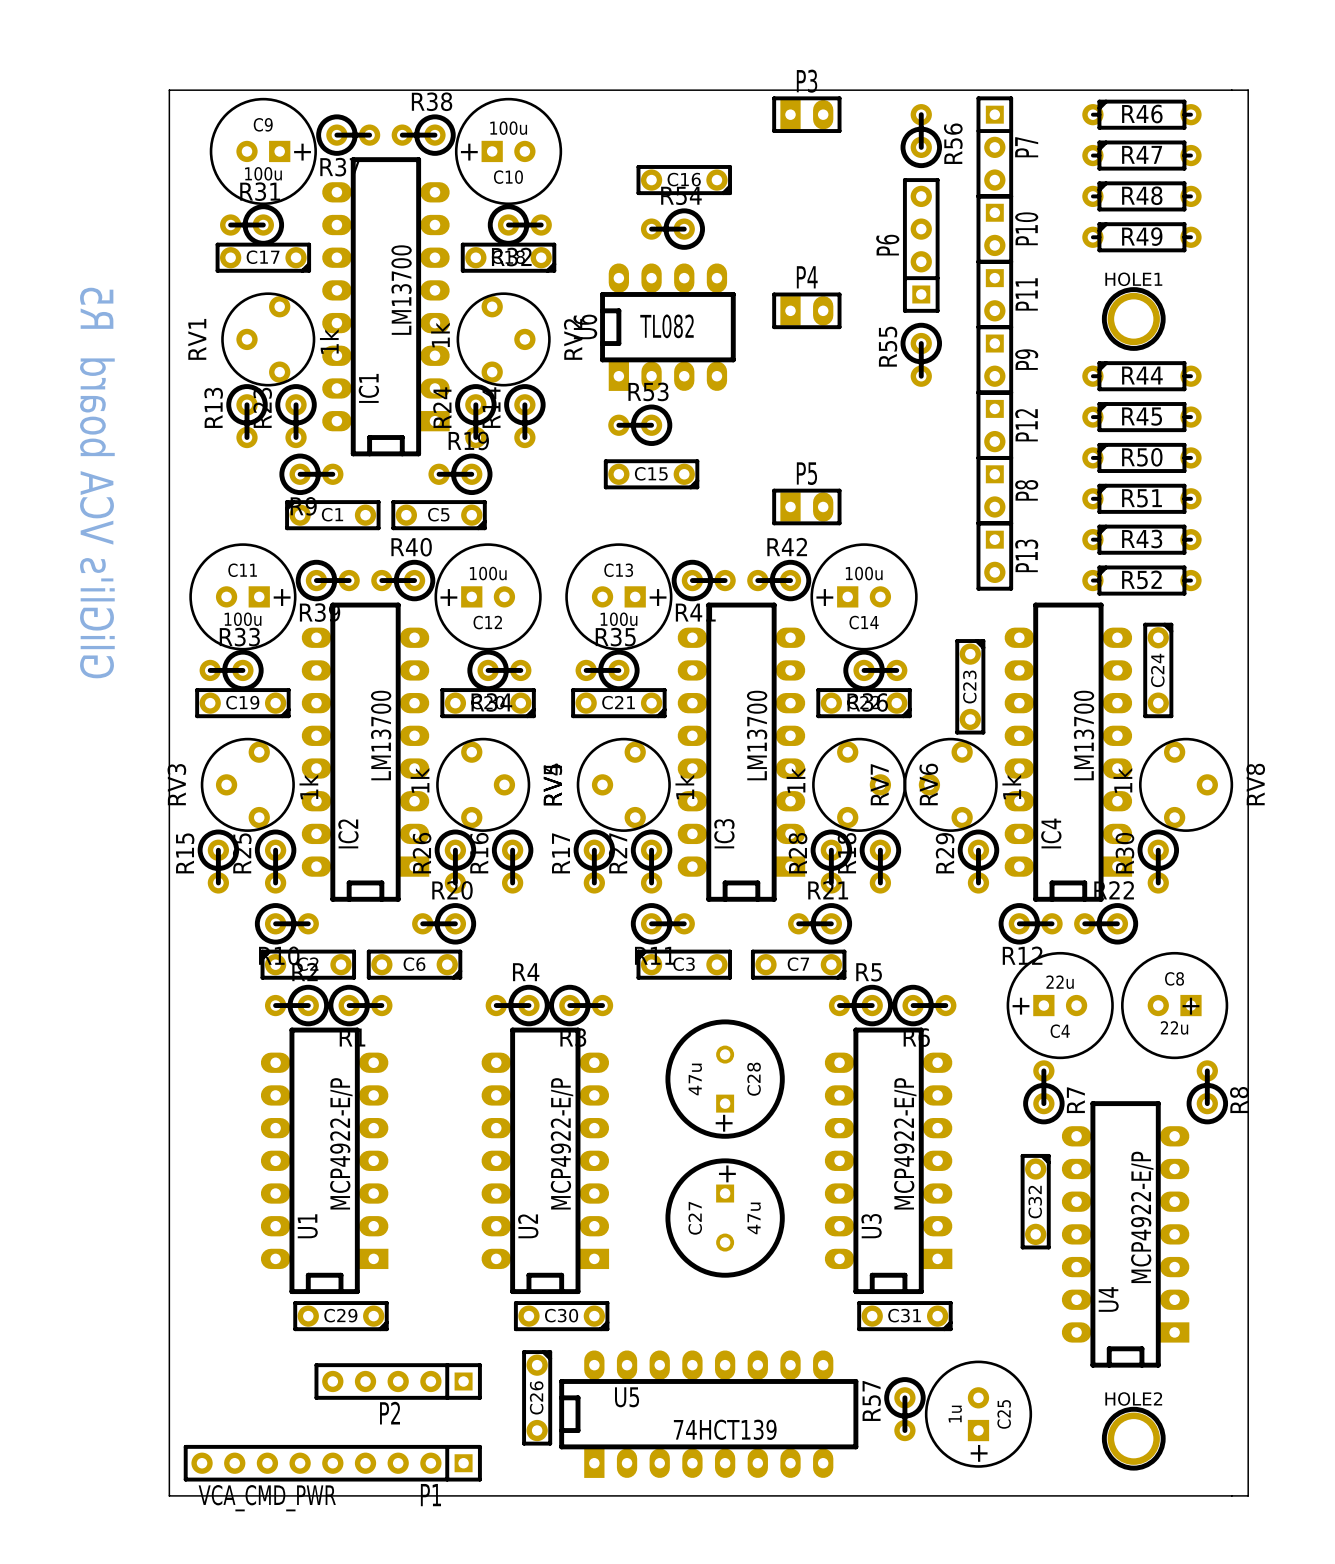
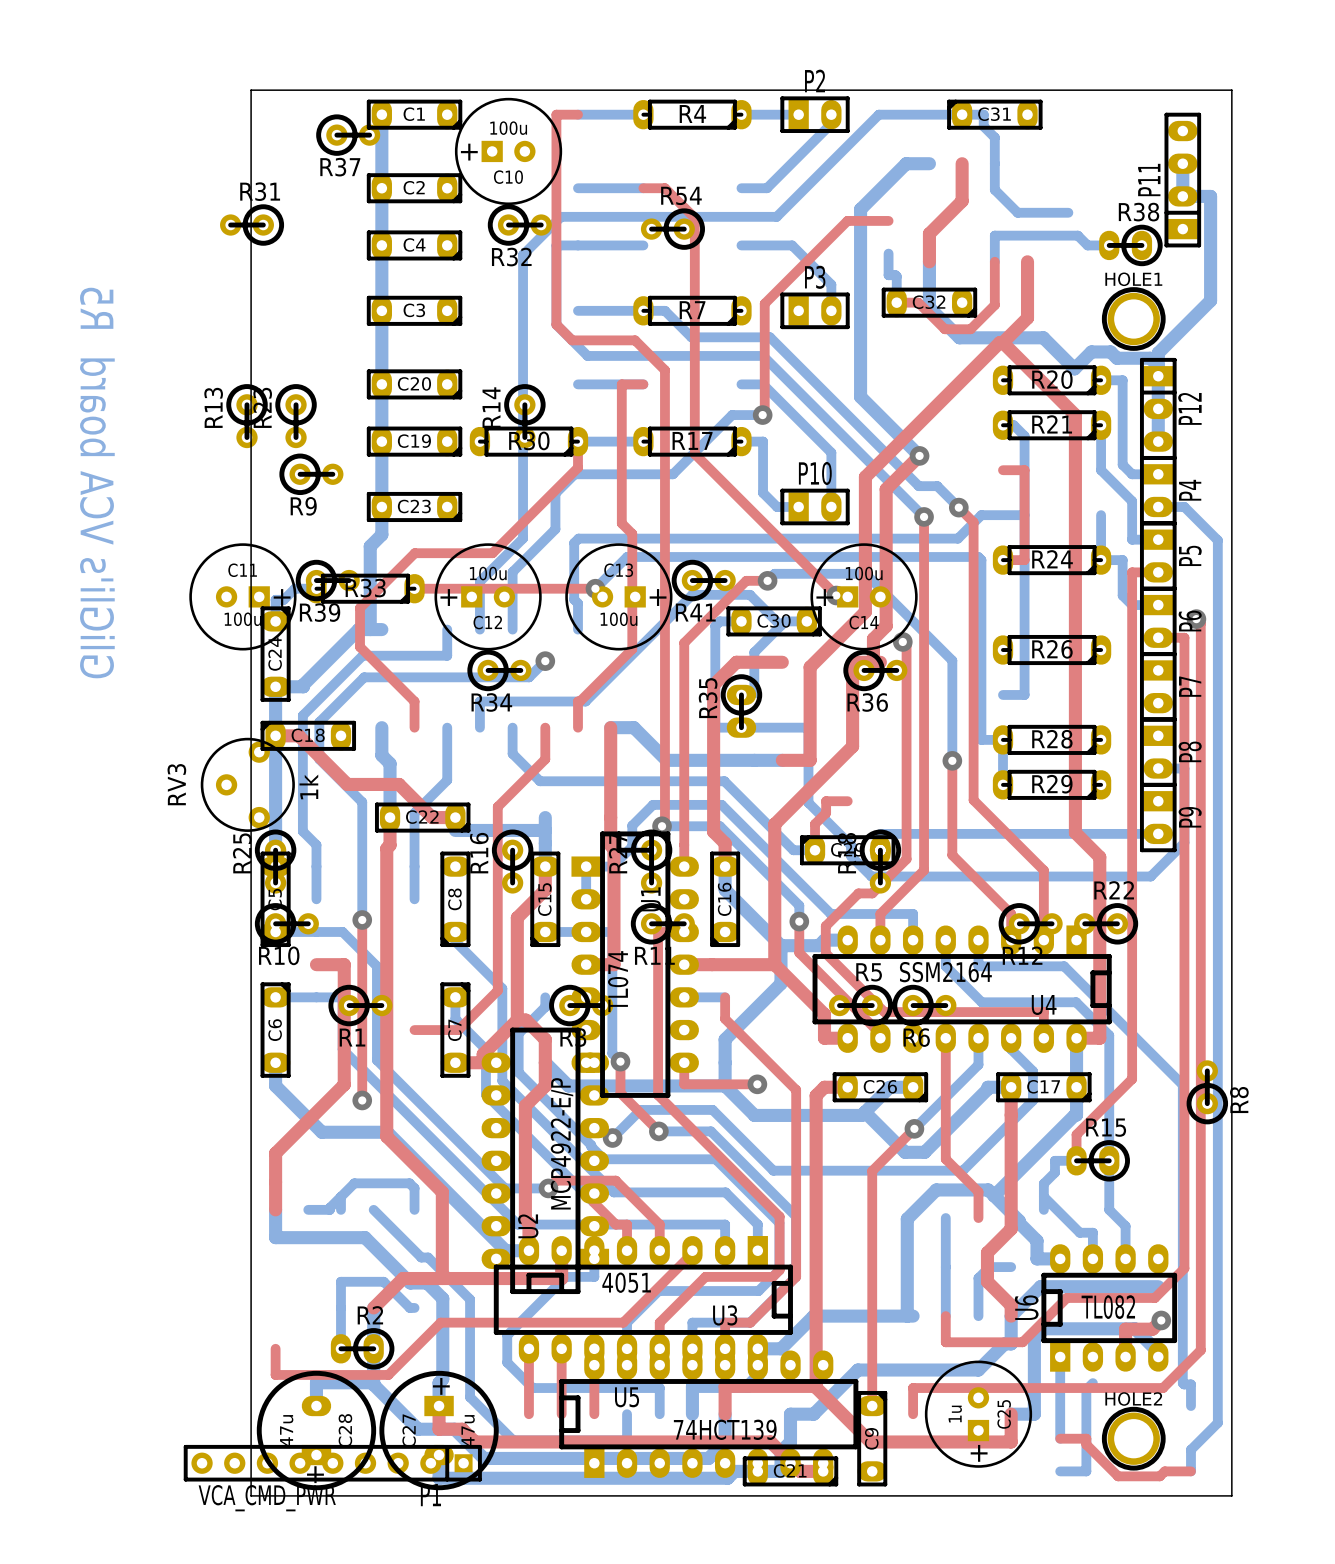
board edge: (251, 90) (169, 90) (169, 1495) (251, 1495) -> (251, 90) (251, 1495)
board edge: (1231, 90) (1248, 90) (1248, 1495) (1231, 1495) -> (1231, 90) (1231, 1495)
P7 footprint: [976, 96, 1014, 199] -> [1139, 652, 1177, 722]
C9 footprint: [209, 97, 317, 206] -> [857, 1390, 888, 1487]
bottom track: none -> (381, 114) (381, 534) (370, 546) (370, 629)
R38 footprint: [391, 114, 456, 156] -> [1099, 224, 1163, 267]
top track: none -> (578, 114) (556, 114) (556, 324) (572, 340) (635, 340) (664, 370) (664, 823) (662, 826)
bottom track: none -> (578, 114) (643, 114)
bottom track: none -> (741, 114) (798, 114)
P3 position: (806, 114) -> (815, 310)
bottom track: none -> (831, 114) (831, 123) (766, 188) (741, 188)
R46: (1141, 114) -> none
C9 name position: C9 (263, 124) -> C9 (871, 1438)
R56: (921, 136) -> none
R47: (1141, 155) -> none
bottom track: none -> (929, 163) (906, 163) (860, 209) (860, 396) (919, 455)
top track: none -> (962, 163) (962, 201) (929, 233) (929, 261)
bottom track: none -> (1182, 163) (1182, 196) (1210, 196) (1210, 300) (1158, 353) (1158, 441)
C16 footprint: [636, 165, 732, 196] -> [710, 851, 741, 948]
C9 value: 100u (263, 173) -> none
P6 footprint: [902, 178, 940, 313] -> [1139, 586, 1177, 657]
bottom track: none -> (578, 188) (643, 188)
top track: none -> (643, 188) (664, 188) (694, 218) (694, 454) (836, 595)
P10 footprint: [976, 194, 1014, 264] -> [780, 488, 850, 526]
R48: (1141, 196) -> none
bottom track: none -> (1068, 212) (1017, 212) (994, 189) (994, 137) (983, 126) (983, 114) (878, 114) (776, 216) (561, 216) (523, 254) (523, 538) (479, 581) (479, 629)
top track: none -> (888, 220) (847, 220) (764, 303) (764, 412) (762, 415)
P10 name position: P10 (1026, 228) -> P10 (815, 473)
R49: (1141, 237) -> none
C17 footprint: [215, 242, 312, 273] -> [996, 1072, 1092, 1103]
C18 footprint: [460, 242, 557, 273] -> [260, 720, 357, 751]
bottom track: none -> (643, 245) (556, 245) (556, 324) (587, 355) (763, 355) (924, 516)
bottom track: none -> (741, 245) (792, 245) (831, 284) (831, 310)
P6 name position: P6 (887, 245) -> P6 (1190, 621)
bottom track: none -> (1109, 245) (1087, 245) (1077, 235) (994, 235) (994, 261)
bottom track: none -> (888, 253) (888, 275) (896, 276) (896, 302)
P11 footprint: [976, 259, 1014, 330] -> [1164, 112, 1202, 248]
bottom track: none -> (929, 261) (929, 307) (959, 337) (1043, 337) (1074, 368) (1091, 351) (1110, 351) (1116, 358) (1150, 358) (1158, 366)
top track: none -> (994, 261) (994, 305) (970, 329) (944, 329) (918, 302) (896, 302)
top track: none -> (1027, 261) (1027, 318) (1002, 342)
P11 name position: P11 (1026, 294) -> P11 (1149, 180)
IC1: LM13700 (385, 306) -> none
bottom track: none -> (578, 310) (664, 310) (691, 337) (770, 337) (918, 486) (937, 486) (958, 507)
P4 rotation: 0° (806, 310) -> 90° clockwise (1158, 490)
P4 position: (806, 310) -> (1158, 490)
P9 footprint: [976, 325, 1014, 395] -> [1139, 782, 1177, 853]
U6 position: (667, 327) -> (1109, 1307)
RV1: 1k (268, 339) -> none
RV2: 1k (503, 339) -> none
top track: none -> (1002, 342) (1075, 415) (1075, 832) (1099, 857) (1099, 1038) (1076, 1038)
top track: none -> (1002, 342) (999, 342) (865, 477) (865, 611) (810, 667) (810, 760) (782, 760)
R55: (921, 354) -> none
R44: (1141, 376) -> none
bottom track: none -> (1101, 380) (1122, 380) (1122, 464) (1132, 474) (1158, 474)
R24 footprint: [455, 384, 497, 449] -> [992, 545, 1112, 576]
bottom track: none -> (578, 384) (643, 384)
top track: none -> (643, 384) (621, 384) (621, 523) (632, 533) (632, 649) (578, 701) (578, 727)
bottom track: none -> (741, 384) (763, 384) (831, 452) (831, 506)
P12 footprint: [976, 390, 1014, 460] -> [1139, 357, 1177, 460]
R24 name position: R24 (442, 407) -> R24 (1052, 559)
bottom track: none -> (762, 415) (732, 415) (672, 474) (574, 474) (555, 493) (555, 529) (512, 572) (512, 629)
via: none -> (762, 415)
R45: (1141, 417) -> none
R53: (640, 425) -> none
bottom track: none -> (1003, 425) (1013, 425) (1024, 436) (1024, 694) (1003, 694)
bottom track: none -> (1101, 425) (1101, 470) (1132, 501) (1132, 539) (1158, 539)
top track: none -> (578, 441) (578, 467) (492, 553) (414, 553) (360, 608) (360, 646) (414, 701) (414, 727)
bottom track: none -> (578, 441) (643, 441)
bottom track: none -> (741, 441) (763, 441) (763, 492) (777, 506) (798, 506)
top track: none -> (919, 455) (886, 489) (886, 626) (873, 638) (873, 662)
via: none -> (919, 455)
P8 footprint: [976, 455, 1014, 526] -> [1139, 717, 1177, 787]
R50: (1141, 457) -> none
C15 footprint: [603, 459, 700, 490] -> [530, 851, 561, 948]
top track: none -> (1003, 470) (1024, 470) (1024, 560) (1003, 560)
R19: (460, 474) -> none
R51: (1141, 498) -> none
C1 footprint: [285, 500, 381, 531] -> [366, 99, 463, 130]
C5 footprint: [391, 500, 487, 531] -> [260, 851, 291, 948]
P5 rotation: 0° (806, 506) -> 90° clockwise (1158, 556)
P5 position: (806, 506) -> (1158, 556)
bottom track: none -> (1158, 506) (1184, 506) (1217, 540) (1217, 1422) (1190, 1449) (1190, 1471)
top track: none -> (958, 507) (973, 522) (973, 800) (1043, 870) (1043, 940)
via: none -> (958, 507)
bottom track: none -> (1024, 515) (981, 515) (957, 538) (578, 538) (574, 543) (574, 599) (578, 603) (578, 629)
bottom track: none -> (1101, 515) (1101, 560) (1122, 560) (1122, 595) (1132, 605) (1158, 605)
top track: none -> (924, 516) (924, 870) (880, 913) (880, 940)
via: none -> (924, 516)
R43: (1141, 539) -> none
P13: (994, 556) -> none
top track: none -> (1158, 572) (1132, 572) (1132, 1079) (1076, 1134) (1076, 1160)
R40: (403, 580) -> none
top track: none -> (767, 580) (746, 580) (684, 642) (684, 866)
bottom track: none -> (767, 580) (774, 573) (865, 573) (952, 660) (952, 760)
via: none -> (767, 580)
R42: (779, 580) -> none
R52: (1141, 580) -> none
bottom track: none -> (316, 588) (294, 588) (283, 599) (275, 599) (275, 621)
top track: none -> (414, 588) (595, 588)
bottom track: none -> (595, 588) (627, 556) (978, 556) (981, 560) (981, 739) (1003, 739) (1003, 784)
via: none -> (595, 588)
via: none -> (836, 595)
top track: none -> (1196, 619) (1200, 623) (1200, 1350) (1163, 1388) (913, 1388) (913, 1414)
via: none -> (1196, 619)
bottom track: none -> (741, 621) (719, 621) (715, 625) (715, 727) (808, 727) (808, 802) (851, 845) (851, 856) (871, 876) (1150, 876) (1184, 842) (1184, 768) (1158, 768)
bottom track: none -> (806, 621) (785, 621) (754, 652) (754, 693) (743, 693) (741, 694)
C24 footprint: [1143, 622, 1174, 719] -> [260, 606, 291, 702]
bottom track: none -> (780, 625) (750, 594) (692, 594) (585, 701) (479, 701) (479, 727)
bottom track: none -> (381, 629) (358, 629) (303, 686) (275, 686) (275, 866)
bottom track: none -> (447, 629) (447, 655) (362, 655) (302, 715) (302, 831) (316, 845) (316, 899)
R33 name position: R33 (239, 637) -> R33 (365, 588)
R35 name position: R35 (615, 637) -> R35 (708, 698)
top track: none -> (1158, 637) (1184, 637) (1184, 1268) (1154, 1297) (1066, 1297) (1022, 1342) (945, 1342) (945, 1316)
C23 footprint: [955, 639, 986, 735] -> [366, 491, 463, 523]
top track: none -> (902, 641) (906, 645) (906, 859) (872, 893) (858, 893) (825, 926) (825, 953) (884, 1012) (1043, 1012) (1043, 1038)
via: none -> (902, 641)
R33 footprint: [199, 649, 264, 692] -> [306, 573, 425, 604]
R35 footprint: [575, 649, 640, 692] -> [720, 674, 763, 738]
bottom track: none -> (545, 661) (529, 677) (364, 677) (319, 722) (319, 759) (362, 802) (362, 920)
via: none -> (545, 661)
top track: none -> (782, 662) (736, 662) (713, 685) (713, 831) (725, 843) (725, 866)
top track: none -> (880, 662) (852, 662) (852, 746) (774, 824) (774, 964)
C19 footprint: [195, 688, 291, 719] -> [366, 426, 463, 457]
C20 footprint: [440, 688, 536, 719] -> [366, 369, 463, 400]
C21 footprint: [571, 688, 667, 719] -> [742, 1456, 839, 1487]
C22 footprint: [816, 688, 912, 719] -> [374, 802, 471, 833]
bottom track: none -> (381, 727) (381, 755) (390, 763) (390, 817)
bottom track: none -> (447, 727) (447, 780) (414, 812) (414, 899)
bottom track: none -> (512, 727) (512, 753) (540, 781) (724, 781) (793, 850) (815, 850)
top track: none -> (545, 727) (545, 759) (497, 806) (497, 990) (458, 1030) (414, 1030)
top track: none -> (610, 727) (610, 845) (613, 848) (613, 964) (586, 964)
bottom track: none -> (610, 727) (633, 727) (666, 760) (782, 760)
top track: none -> (275, 735) (298, 735) (347, 784) (399, 784) (432, 817) (455, 817)
IC2: LM13700 (365, 752) -> none
IC3: LM13700 (741, 752) -> none
IC4: LM13700 (1068, 752) -> none
top track: none -> (952, 760) (952, 855) (1011, 913) (1011, 940)
via: none -> (952, 760)
part: 1k (483, 784) -> none
part: 1k (623, 784) -> none
RV6: 1k (859, 784) -> none
RV7: 1k (950, 784) -> none
RV8: 1k (1186, 784) -> none
top track: none -> (847, 801) (826, 801) (826, 812) (815, 824) (815, 850)
top track: none -> (390, 817) (390, 845) (386, 848) (386, 1136) (442, 1192) (442, 1278)
bottom track: none -> (545, 817) (545, 866)
bottom track: none -> (662, 826) (720, 826) (799, 905) (799, 921)
via: none -> (662, 826)
R15 footprint: [197, 829, 240, 894] -> [1066, 1140, 1130, 1182]
R26 footprint: [434, 829, 477, 894] -> [992, 634, 1112, 666]
R17 footprint: [573, 829, 616, 894] -> [633, 426, 752, 457]
R28 footprint: [810, 829, 853, 894] -> [992, 724, 1112, 755]
R29 footprint: [957, 829, 1000, 894] -> [992, 769, 1112, 800]
R30 footprint: [1137, 829, 1180, 894] -> [469, 426, 589, 457]
bottom track: none -> (455, 830) (545, 830)
bottom track: none -> (880, 833) (1158, 833)
R15 name position: R15 (185, 853) -> R15 (1106, 1127)
R26 name position: R26 (422, 853) -> R26 (1052, 649)
R17 name position: R17 (560, 853) -> R17 (692, 440)
R28 name position: R28 (798, 853) -> R28 (1052, 739)
R29 name position: R29 (945, 853) -> R29 (1052, 784)
R30 name position: R30 (1124, 853) -> R30 (529, 440)
top track: none -> (545, 866) (545, 889) (517, 917) (517, 1020)
bottom track: none -> (725, 866) (725, 889) (780, 945)
R20 name position: R20 (452, 890) -> R20 (1052, 379)
R21 name position: R21 (828, 890) -> R21 (1052, 424)
bottom track: none -> (586, 899) (586, 866) (612, 866) (632, 846) (632, 825) (653, 804) (721, 804) (830, 913) (913, 913) (913, 940)
R20 footprint: [412, 903, 477, 945] -> [992, 365, 1112, 396]
R21 footprint: [788, 903, 853, 945] -> [992, 410, 1112, 441]
top track: none -> (362, 920) (362, 1100)
via: none -> (362, 920)
top track: none -> (799, 921) (799, 952) (880, 1033) (880, 1038)
via: none -> (799, 921)
bottom track: none -> (275, 931) (342, 931) (376, 966) (376, 1060) (505, 1188) (548, 1188)
bottom track: none -> (455, 931) (455, 941) (502, 988) (502, 1080) (613, 1192) (725, 1192) (757, 1224) (757, 1250)
bottom track: none -> (545, 931) (612, 931) (612, 1053) (620, 1061)
top track: none -> (684, 931) (658, 931) (658, 1095) (779, 1216) (779, 1270) (772, 1276) (705, 1276) (659, 1322) (659, 1348)
bottom track: none -> (847, 940) (824, 940) (818, 945) (780, 945)
bottom track: none -> (945, 940) (945, 966) (981, 1002) (1076, 1002) (1109, 1035) (1109, 1209) (1125, 1226) (1125, 1258)
bottom track: none -> (978, 940) (978, 966) (1064, 966) (1182, 1084) (1182, 1383) (1190, 1384) (1190, 1406)
bottom track: none -> (780, 945) (780, 983) (725, 1039) (725, 1085)
C2 footprint: [260, 949, 357, 980] -> [366, 173, 463, 204]
C6 footprint: [366, 949, 463, 980] -> [260, 982, 291, 1078]
C3 footprint: [636, 949, 732, 980] -> [366, 295, 463, 326]
C7 footprint: [750, 949, 847, 980] -> [440, 982, 471, 1078]
C4 footprint: [1006, 951, 1114, 1060] -> [366, 230, 463, 261]
C8 footprint: [1121, 951, 1229, 1060] -> [440, 851, 471, 948]
top track: none -> (316, 964) (344, 964) (344, 1084) (275, 1153) (275, 1209)
top track: none -> (684, 964) (774, 964)
top track: none -> (774, 964) (824, 1014) (824, 1038) (847, 1038)
R4 name position: R4 (526, 972) -> R4 (692, 114)
C8 name position: C8 (1174, 978) -> C8 (454, 899)
C4 value: 22u (1060, 982) -> none
R2 footprint: [264, 984, 330, 1027] -> [330, 1328, 395, 1370]
R4 footprint: [485, 984, 550, 1027] -> [633, 99, 752, 130]
bottom track: none -> (275, 997) (342, 997) (342, 1049) (517, 1224) (725, 1224) (725, 1250)
bottom track: none -> (455, 997) (455, 1018) (485, 1049) (485, 1094) (593, 1201)
bottom track: none -> (545, 997) (545, 1007) (518, 1033) (518, 1072) (603, 1159) (715, 1159) (779, 1222) (779, 1270) (758, 1291) (658, 1291) (627, 1322) (627, 1348)
bottom track: none -> (684, 997) (725, 997)
top track: none -> (725, 997) (725, 1018) (796, 1089) (796, 1276) (750, 1322) (725, 1322) (725, 1348)
C28 footprint: [665, 1019, 785, 1139] -> [256, 1370, 377, 1491]
top track: none -> (517, 1020) (525, 1020) (545, 1039) (545, 1085) (525, 1105) (525, 1219) (528, 1222) (528, 1250)
top track: none -> (517, 1020) (483, 1054) (483, 1062) (455, 1062)
U3 footprint: [824, 1027, 953, 1295] -> [493, 1236, 793, 1364]
C8 value: 22u (1174, 1027) -> none
C4 name position: C4 (1060, 1031) -> C4 (414, 244)
top track: none -> (945, 1038) (945, 1159) (978, 1191) (978, 1218)
bottom track: none -> (978, 1038) (978, 1064) (914, 1128)
bottom track: none -> (1011, 1038) (1011, 1049) (1032, 1071) (1032, 1100) (962, 1170) (773, 1170) (712, 1109) (640, 1109) (612, 1138)
bottom track: none -> (1076, 1038) (1076, 1115) (994, 1195)
R7 footprint: [1023, 1060, 1065, 1125] -> [633, 295, 752, 326]
top track: none -> (620, 1061) (620, 1093) (658, 1131)
via: none -> (620, 1061)
bottom track: none -> (275, 1062) (275, 1085) (321, 1132) (387, 1132) (505, 1250) (528, 1250)
bottom track: none -> (545, 1062) (568, 1085) (725, 1085)
top track: none -> (684, 1062) (684, 1084) (757, 1084)
via: none -> (757, 1084)
bottom track: none -> (725, 1085) (754, 1115) (861, 1115) (889, 1087) (913, 1087)
top track: none -> (847, 1087) (824, 1087) (816, 1095) (816, 1387) (870, 1441) (1011, 1441) (1011, 1414)
top track: none -> (1011, 1087) (1011, 1229) (987, 1252) (987, 1281) (1011, 1305) (1011, 1316)
bottom track: none -> (1011, 1087) (987, 1087) (924, 1152) (905, 1152) (864, 1112)
via: none -> (362, 1100)
R7 name position: R7 (1075, 1100) -> R7 (692, 310)
U4 footprint: [1061, 1101, 1190, 1368] -> [812, 925, 1112, 1053]
top track: none -> (914, 1128) (872, 1171) (872, 1406)
via: none -> (914, 1128)
bottom track: none -> (658, 1131) (710, 1131) (795, 1216) (795, 1276) (750, 1322) (692, 1322) (692, 1348)
via: none -> (658, 1131)
via: none -> (612, 1138)
U1 value: MCP4922-E/P (341, 1143) -> TL074 (618, 981)
U3 value: MCP4922-E/P (905, 1143) -> 4051 (626, 1282)
C32 footprint: [1020, 1153, 1051, 1250] -> [881, 287, 978, 318]
C27 footprint: [665, 1158, 785, 1278] -> [379, 1370, 499, 1491]
U1 rotation: 0° (324, 1160) -> 180° (635, 964)
U1 position: (324, 1160) -> (635, 964)
bottom track: none -> (1076, 1160) (1054, 1160) (1054, 1172) (1043, 1183) (1043, 1209)
top track: none -> (548, 1188) (556, 1180) (615, 1180) (659, 1224) (659, 1250)
via: none -> (548, 1188)
bottom track: none -> (340, 1196) (340, 1209)
bottom track: none -> (1043, 1196) (1079, 1232) (1092, 1232) (1092, 1258)
top track: none -> (593, 1201) (615, 1224) (627, 1224) (627, 1250)
bottom track: none -> (275, 1209) (275, 1237) (365, 1237) (410, 1283) (427, 1283) (442, 1298) (442, 1379) (439, 1382) (439, 1406)
bottom track: none -> (308, 1209) (329, 1209) (354, 1183) (409, 1183) (414, 1188) (414, 1209)
bottom track: none -> (373, 1209) (421, 1257) (428, 1257) (470, 1299) (470, 1397) (513, 1440) (627, 1440) (627, 1414)
U4 value: MCP4922-E/P (1142, 1217) -> SSM2164 (945, 972)
bottom track: none -> (945, 1218) (945, 1316)
U3 name position: U3 (871, 1226) -> U3 (725, 1315)
top track: none -> (561, 1250) (561, 1278) (403, 1278) (373, 1307)
bottom track: none -> (594, 1250) (594, 1276) (565, 1276) (507, 1335) (507, 1362) (532, 1388) (659, 1388) (659, 1414)
top track: none -> (692, 1250) (692, 1253) (623, 1322) (440, 1322) (388, 1374) (275, 1374) (275, 1348)
bottom track: none -> (1060, 1258) (1036, 1258) (1036, 1240) (988, 1189) (936, 1189) (907, 1218) (907, 1316)
bottom track: none -> (1011, 1267) (989, 1267) (978, 1278) (978, 1316)
bottom track: none -> (1158, 1286) (1040, 1286) (1011, 1316) (1011, 1343) (1004, 1343) (978, 1370) (857, 1370) (813, 1414) (790, 1414) (790, 1441) (781, 1451) (781, 1471) (734, 1471) (727, 1478) (439, 1478) (439, 1455)
U4 name position: U4 (1108, 1299) -> U4 (1044, 1004)
C29 footprint: [293, 1301, 389, 1332] -> [799, 835, 896, 866]
C30 footprint: [513, 1301, 610, 1332] -> [726, 606, 822, 637]
C31 footprint: [857, 1301, 953, 1332] -> [947, 99, 1043, 130]
bottom track: none -> (373, 1307) (373, 1384) (418, 1429) (454, 1429) (483, 1458) (708, 1458) (725, 1441) (725, 1414)
bottom track: none -> (414, 1307) (409, 1307) (383, 1281) (340, 1281) (340, 1348)
bottom track: none -> (913, 1316) (813, 1316) (781, 1348) (757, 1348) (757, 1376) (748, 1386) (692, 1386) (692, 1414)
top track: none -> (1161, 1320) (1152, 1329) (1125, 1329) (1125, 1356)
via: none -> (1161, 1320)
top track: none -> (528, 1348) (528, 1414)
top track: none -> (561, 1348) (561, 1414)
top track: none -> (594, 1348) (594, 1414)
C26 footprint: [522, 1350, 553, 1446] -> [832, 1072, 929, 1103]
bottom track: none -> (1060, 1356) (1060, 1438)
bottom track: none -> (1158, 1356) (1158, 1352) (1134, 1328) (1043, 1328) (1034, 1338) (1034, 1414) (1011, 1414)
P2 footprint: [314, 1363, 482, 1400] -> [780, 96, 850, 133]
bottom track: none -> (373, 1382) (316, 1382) (316, 1406)
bottom track: none -> (1092, 1383) (1086, 1389) (1086, 1471) (1060, 1471)
top track: none -> (816, 1386) (725, 1386) (725, 1414)
top track: none -> (439, 1406) (439, 1429) (462, 1429) (475, 1441) (770, 1441) (799, 1471) (823, 1471)
R57: (904, 1409) -> none
P2 name position: P2 (390, 1413) -> P2 (815, 80)
top track: none -> (1060, 1438) (1086, 1438) (1086, 1444) (1118, 1476) (1159, 1476) (1164, 1471) (1190, 1471)

